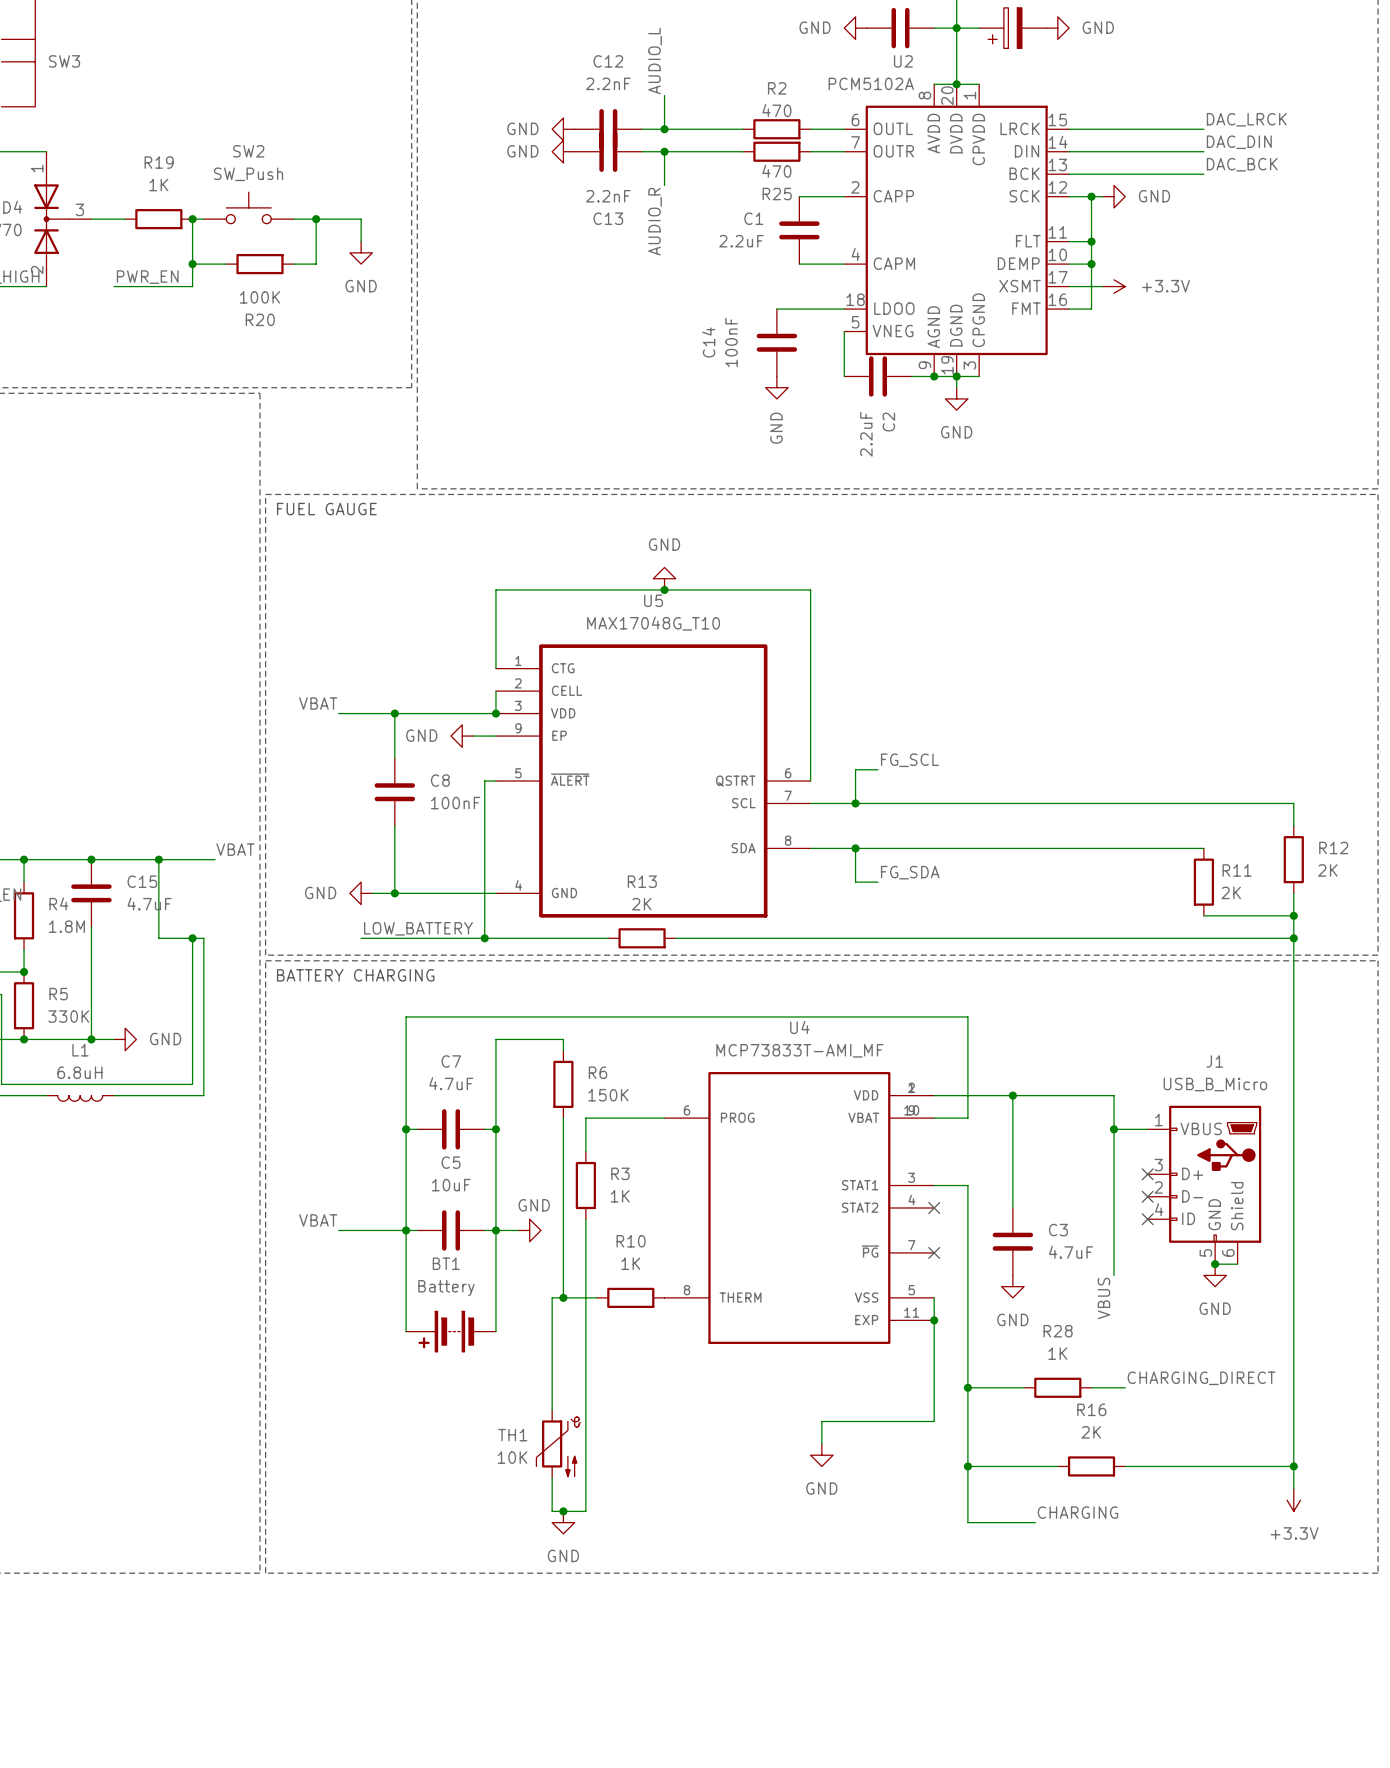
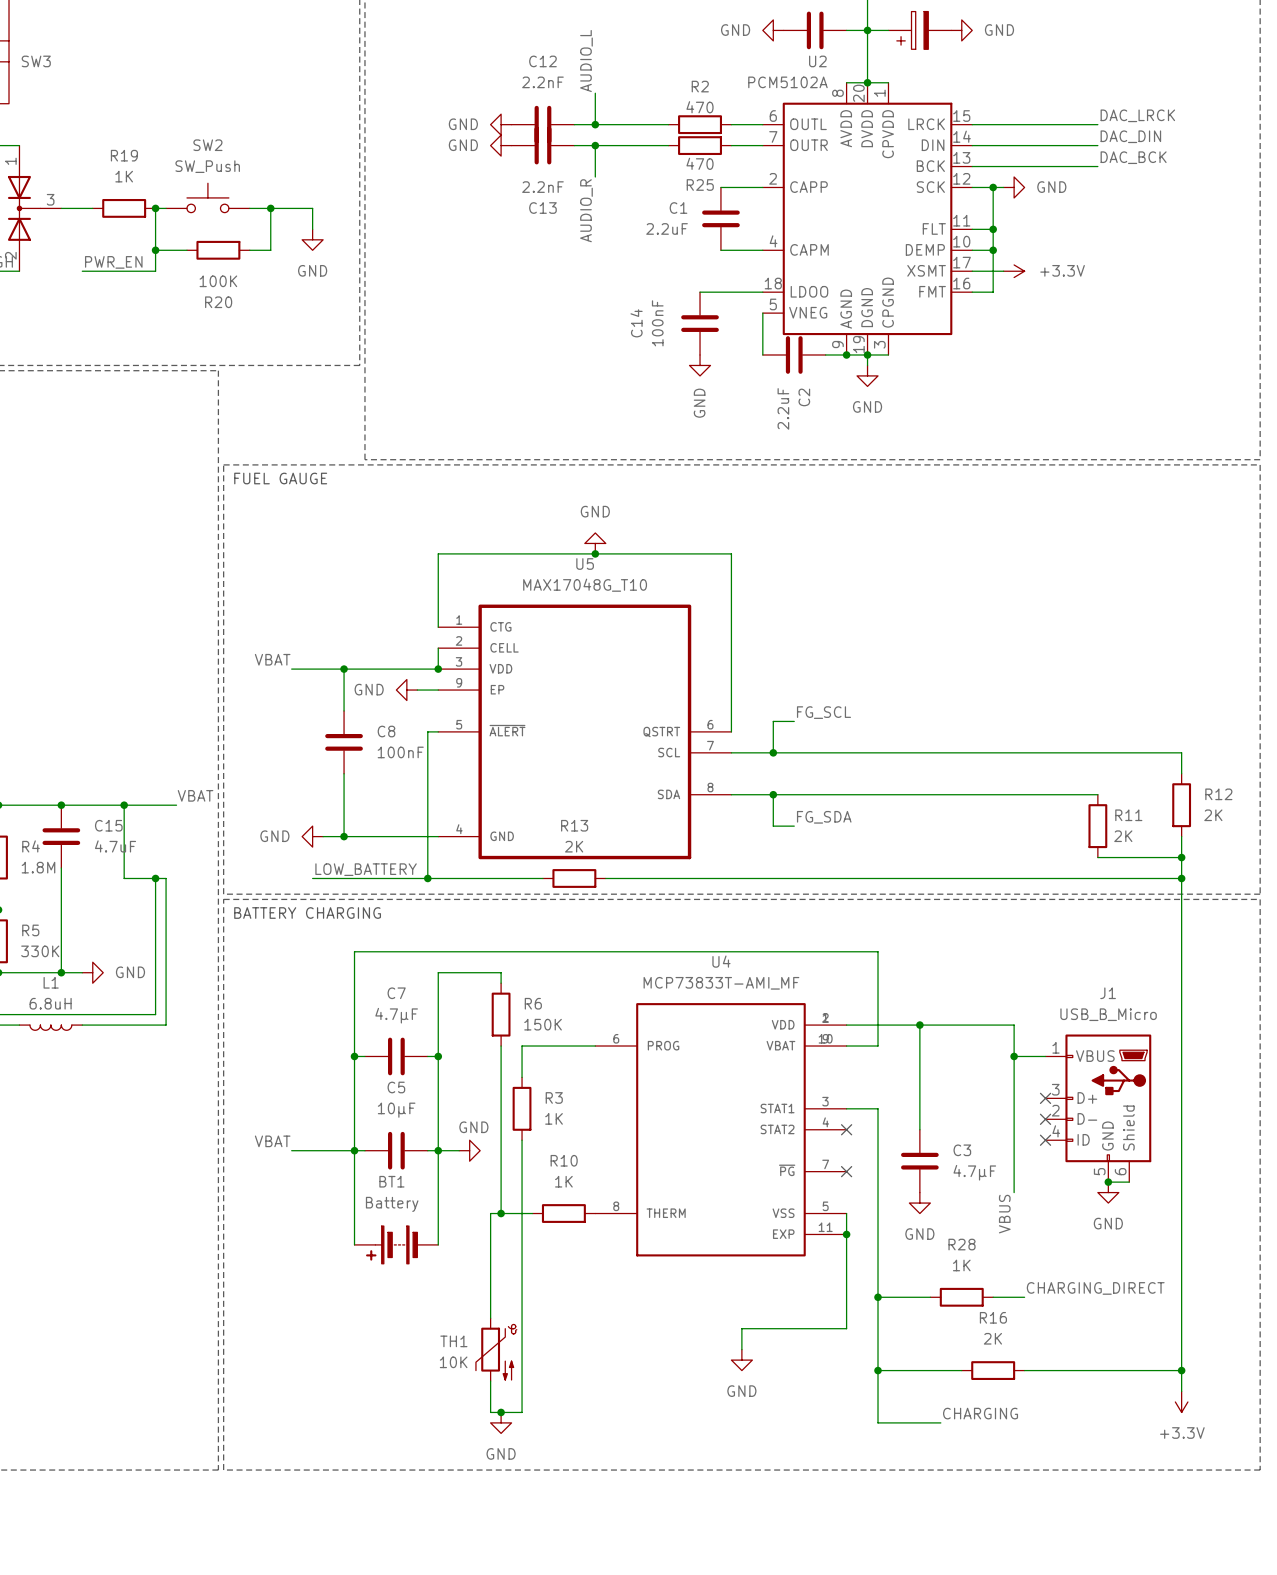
C7 value: 4.7uF (451, 1083) -> 4.7µF (396, 1015)
C5 value: 10uF (451, 1185) -> 10µF (396, 1110)
C3 value: 4.7uF (1071, 1252) -> 4.7µF (974, 1172)

